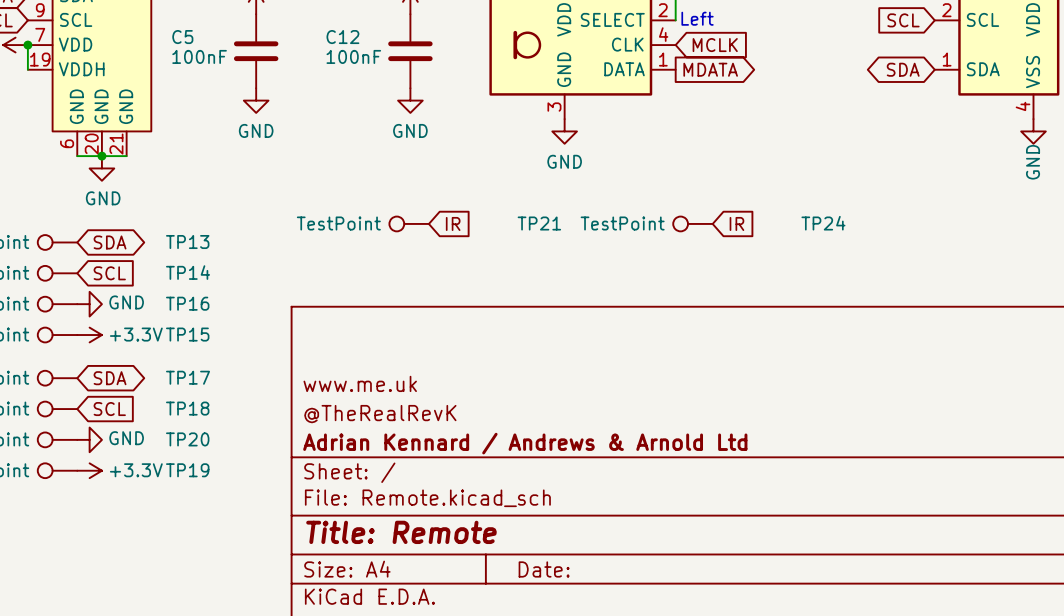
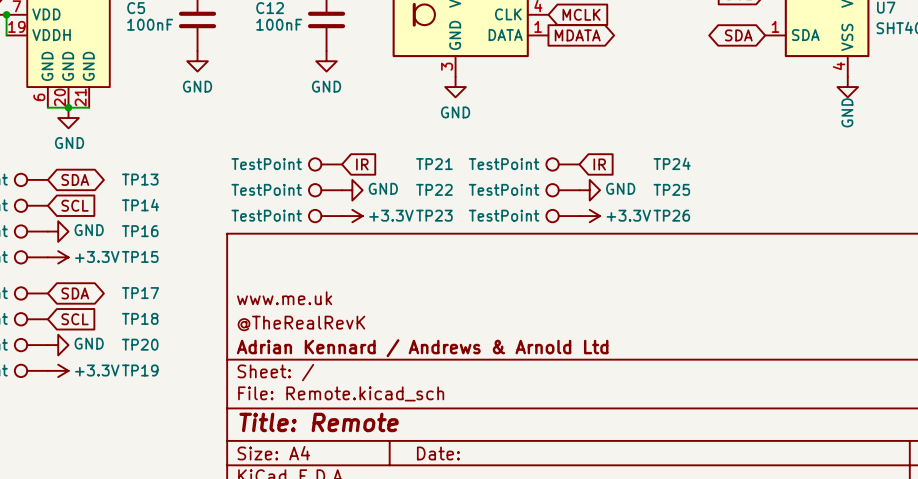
TP22: none -> TestPoint (325, 190)
power symbol: none -> GND (352, 190)
TP25: none -> TestPoint (562, 190)
power symbol: none -> GND (589, 190)
TP23: none -> TestPoint (325, 216)
power symbol: none -> +3.3V (352, 216)
TP26: none -> TestPoint (562, 216)
power symbol: none -> +3.3V (589, 216)

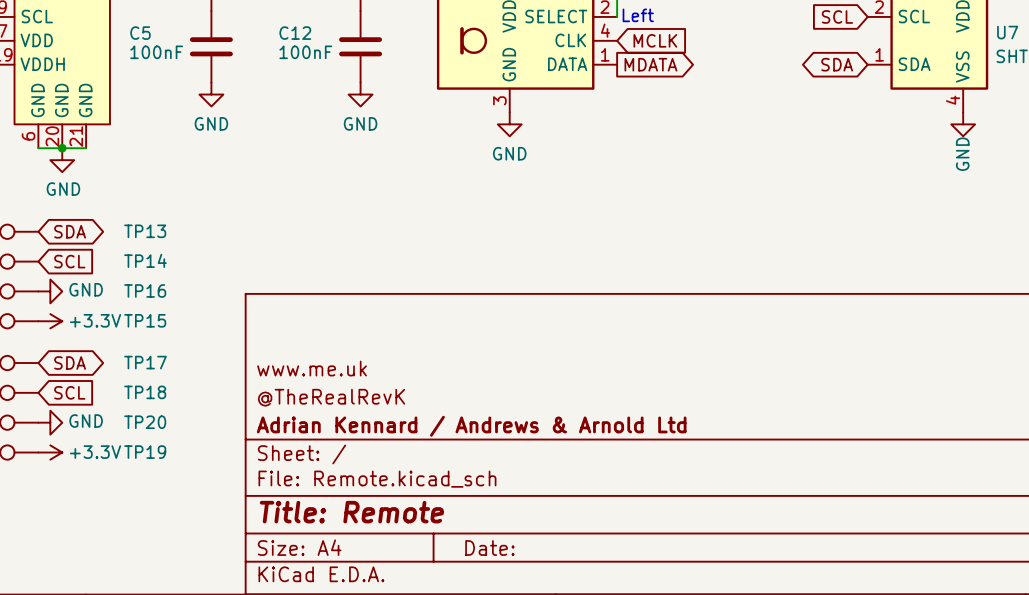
TP21: TestPoint (325, 164) -> none
global label: IR (362, 164) -> none
TP24: TestPoint (562, 164) -> none
global label: IR (599, 164) -> none
TP22: TestPoint (325, 190) -> none
power symbol: GND (352, 190) -> none
TP25: TestPoint (562, 190) -> none
power symbol: GND (589, 190) -> none
TP23: TestPoint (325, 216) -> none
power symbol: +3.3V (352, 216) -> none
TP26: TestPoint (562, 216) -> none
power symbol: +3.3V (589, 216) -> none

